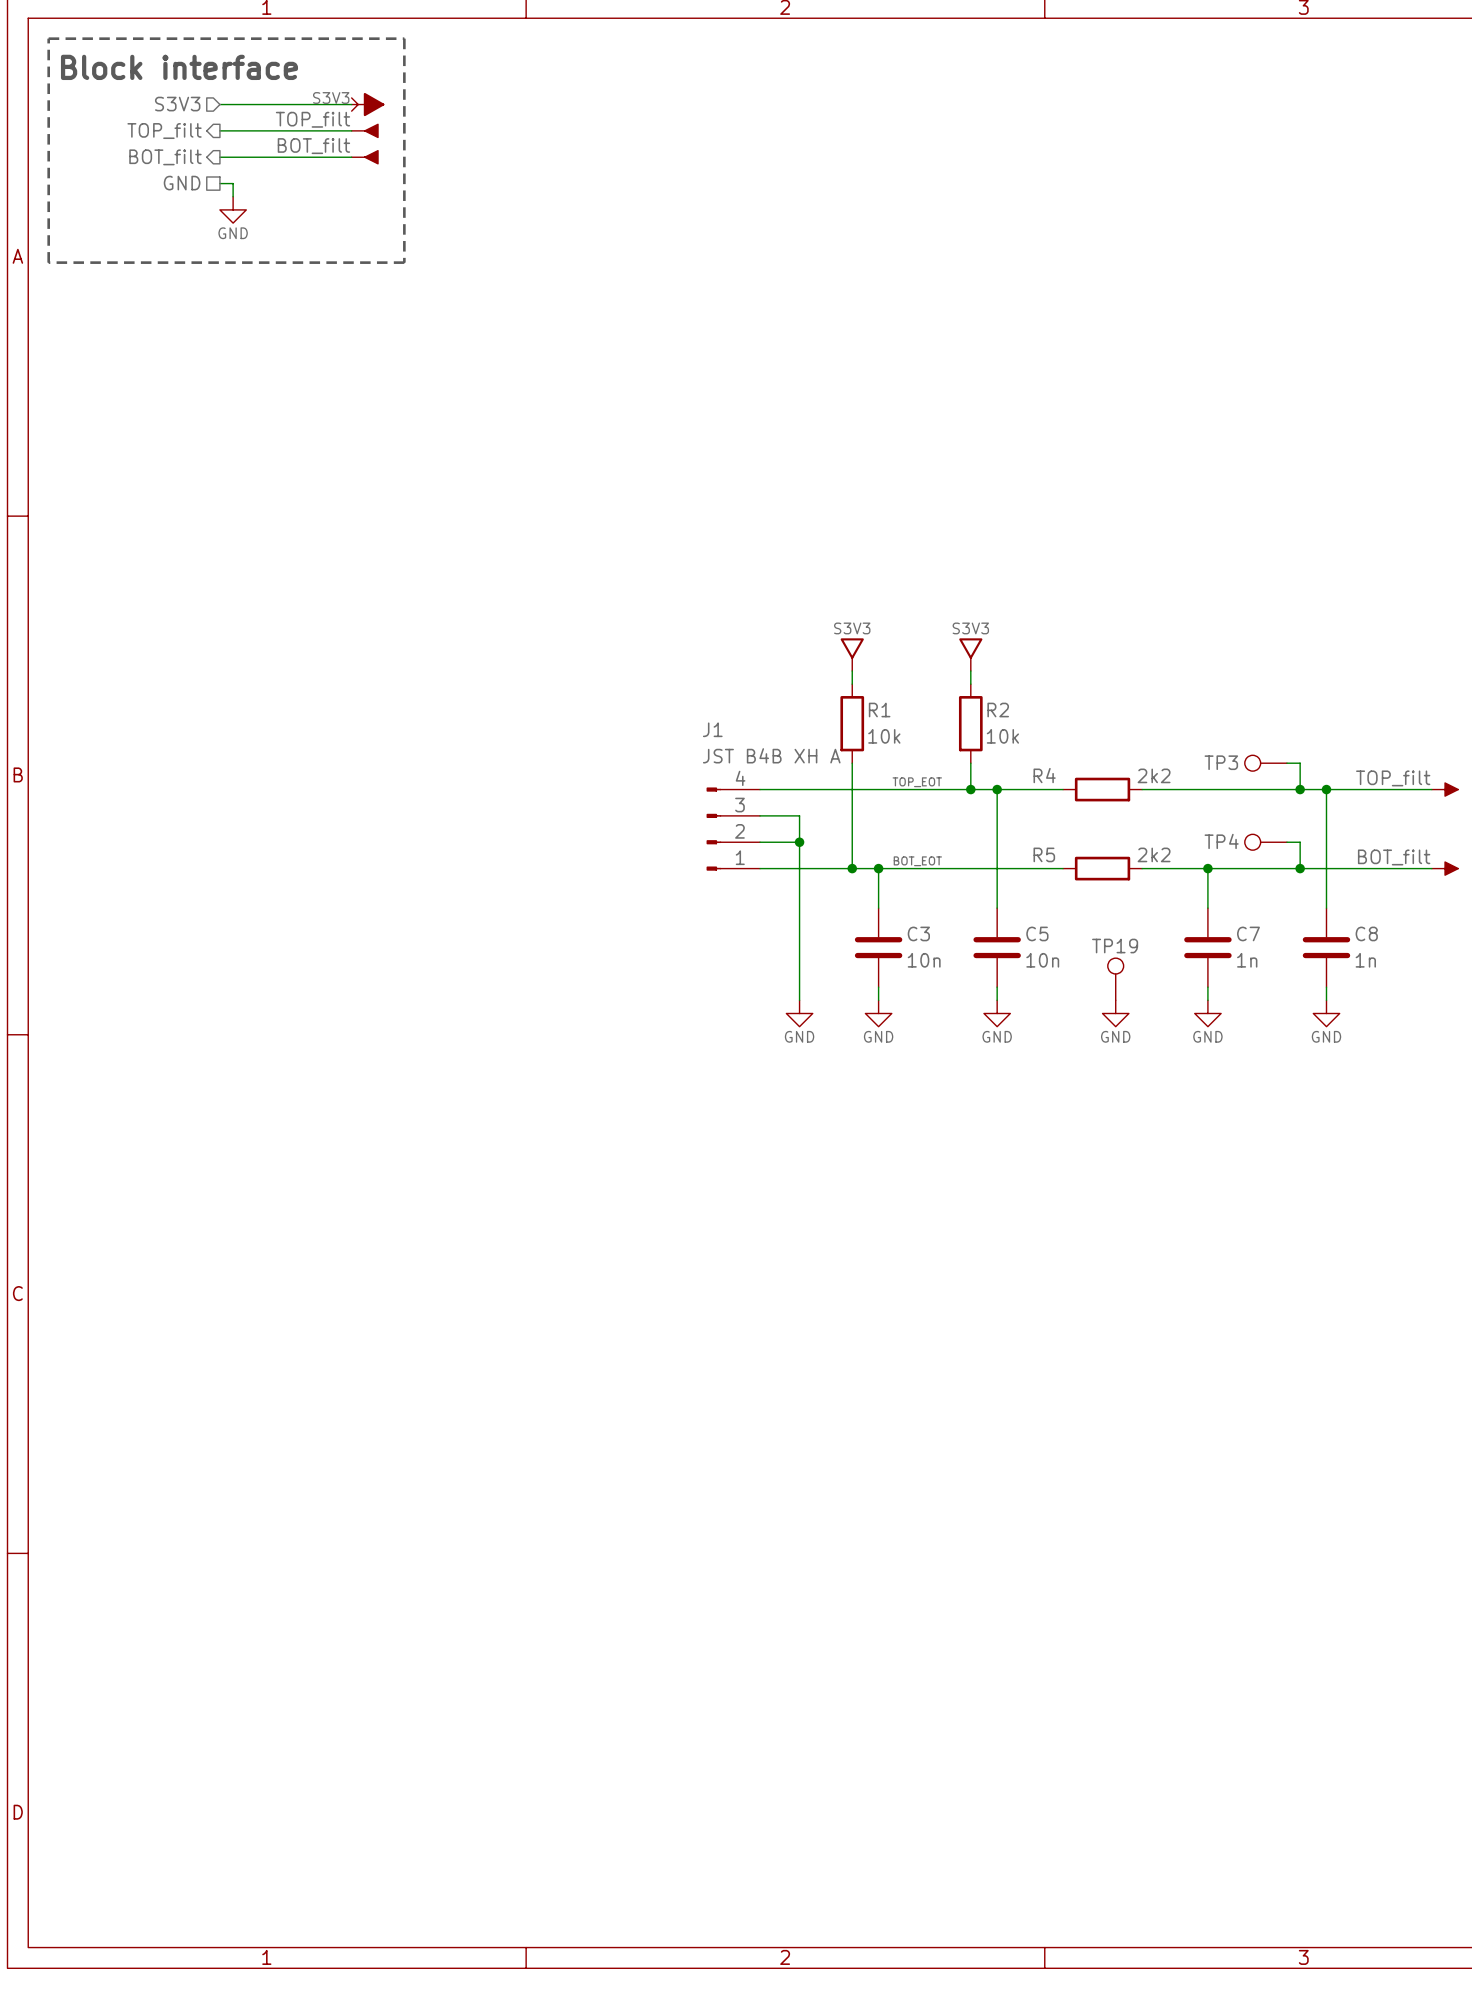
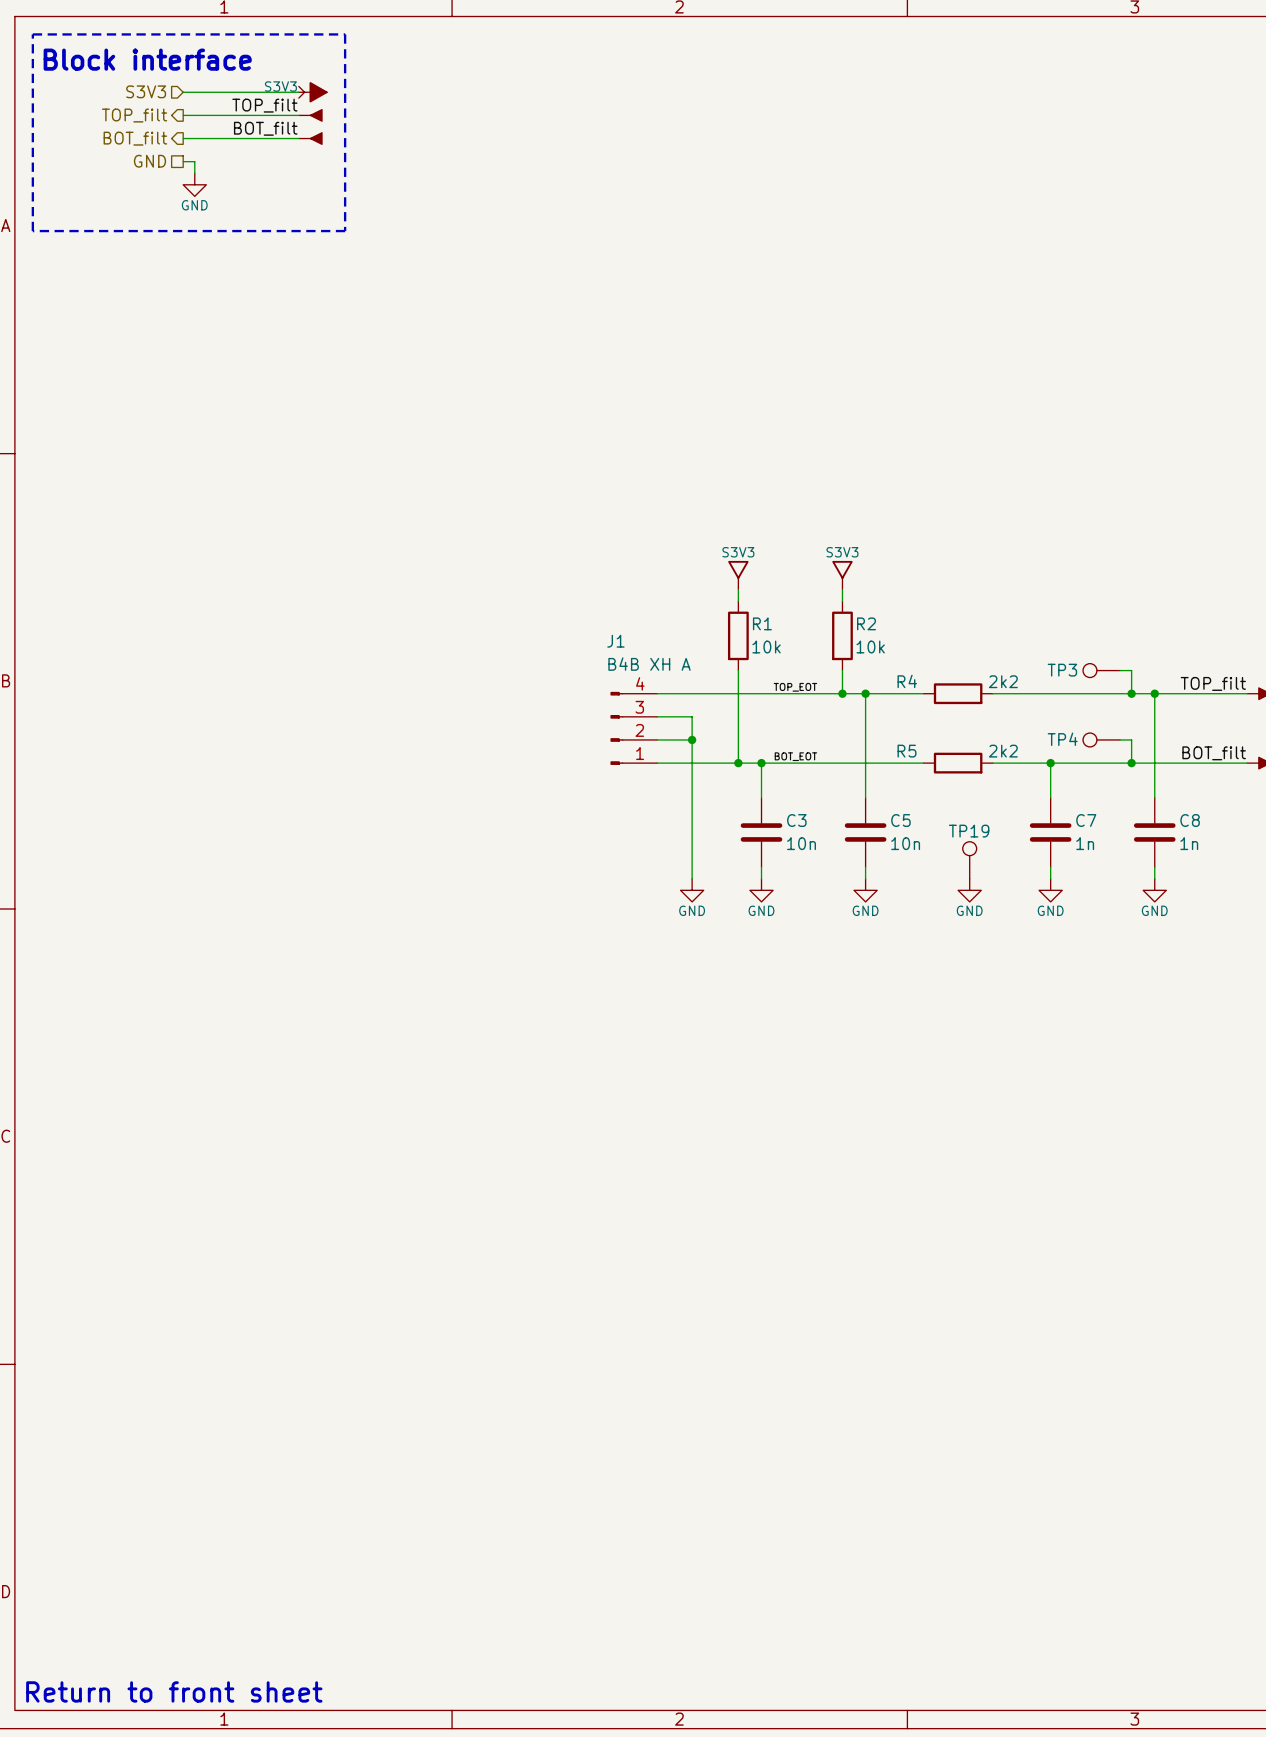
J1 value: JST B4B XH A (771, 755) -> B4B XH A (649, 664)
text: none -> Return to front sheet (174, 1691)

